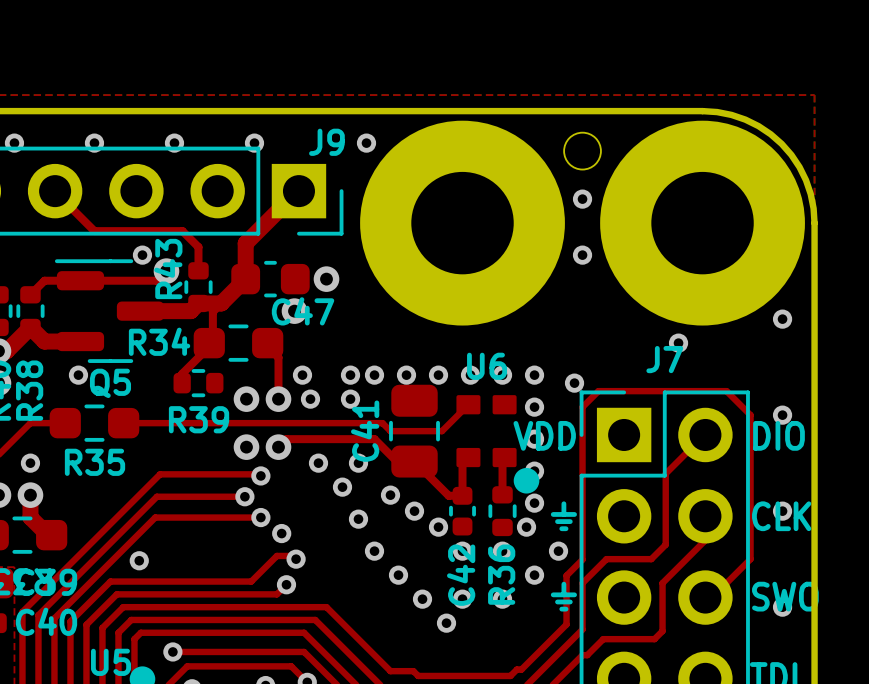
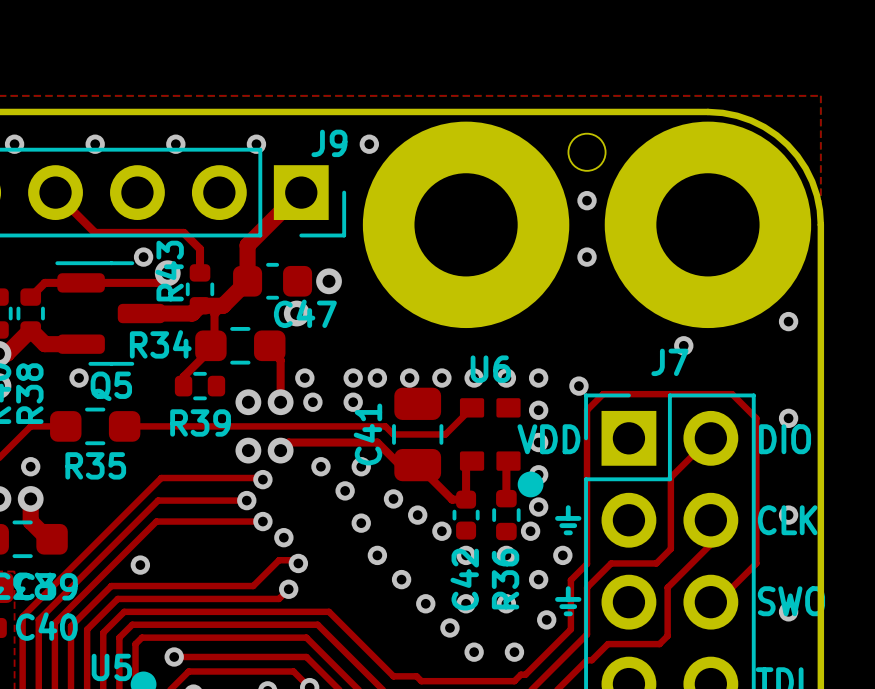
via: none -> (546, 619)
via: none -> (474, 652)
via: none -> (514, 652)

